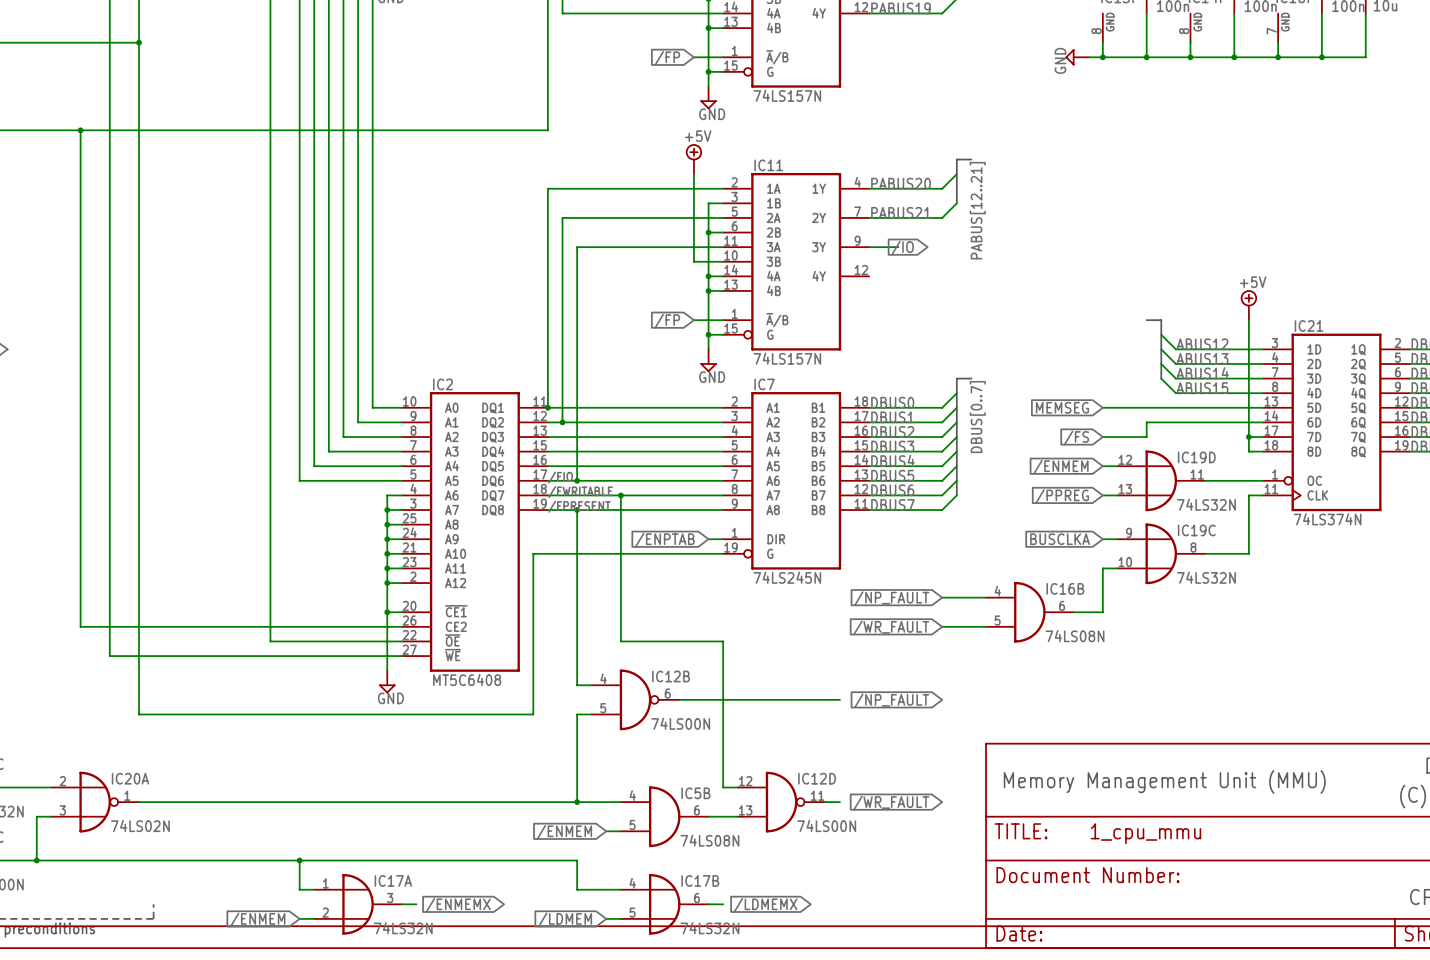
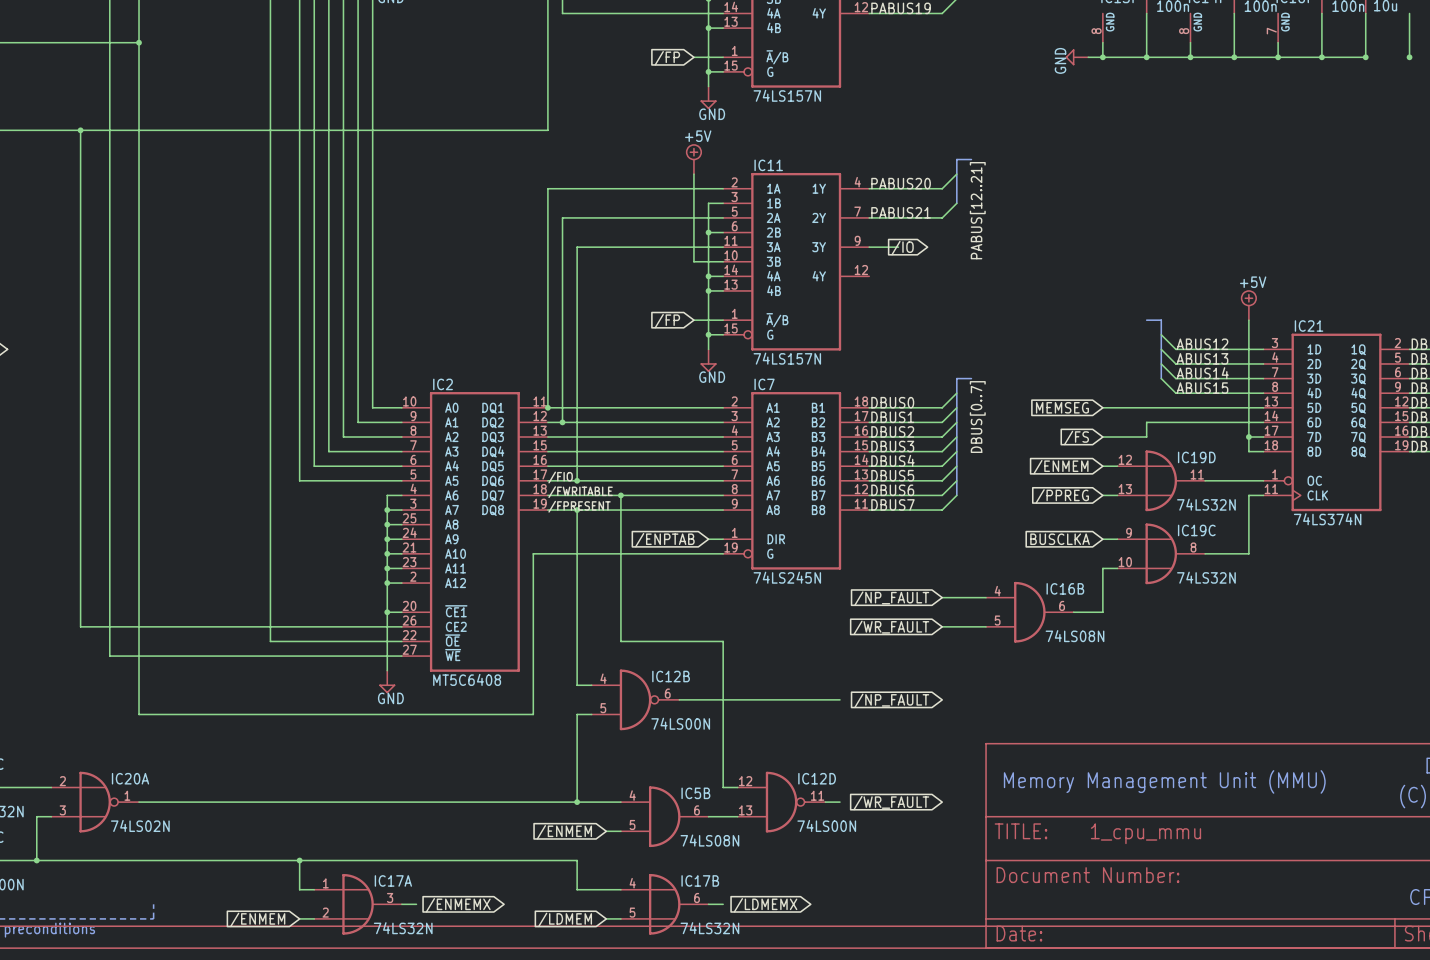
wire: none -> (1409, 13) (1409, 57)
junction: none -> (1365, 57)
junction: none -> (1409, 57)

